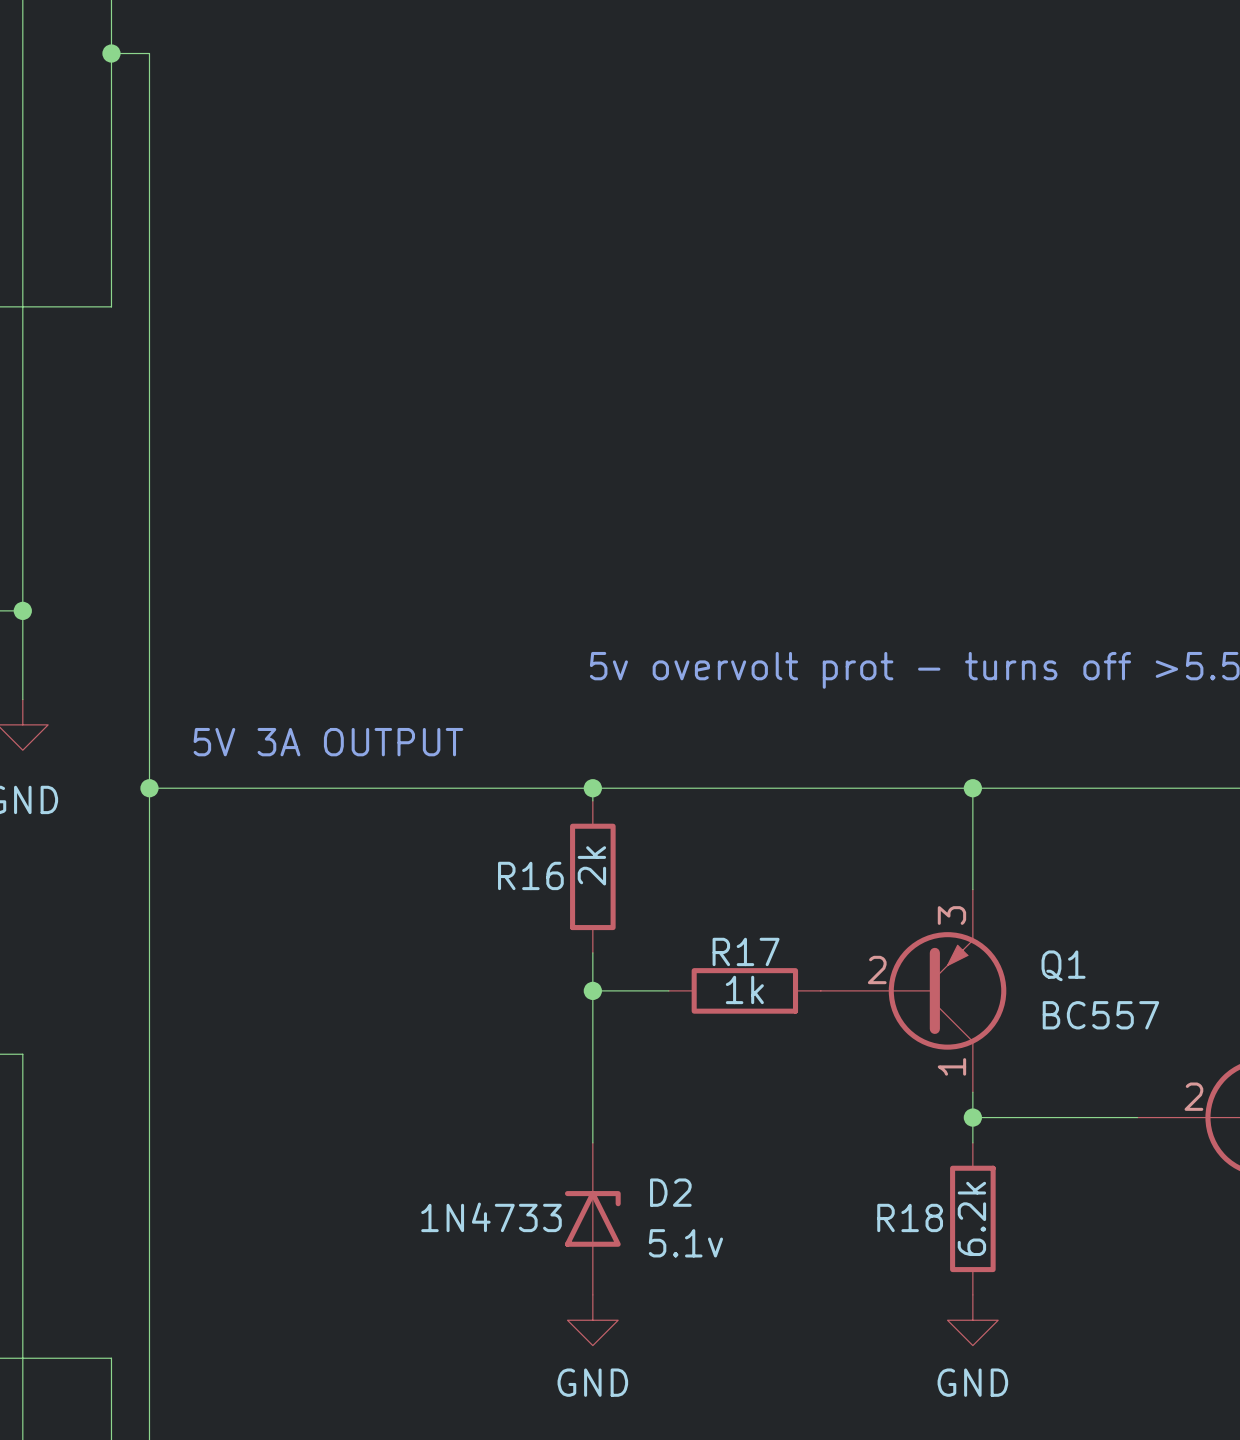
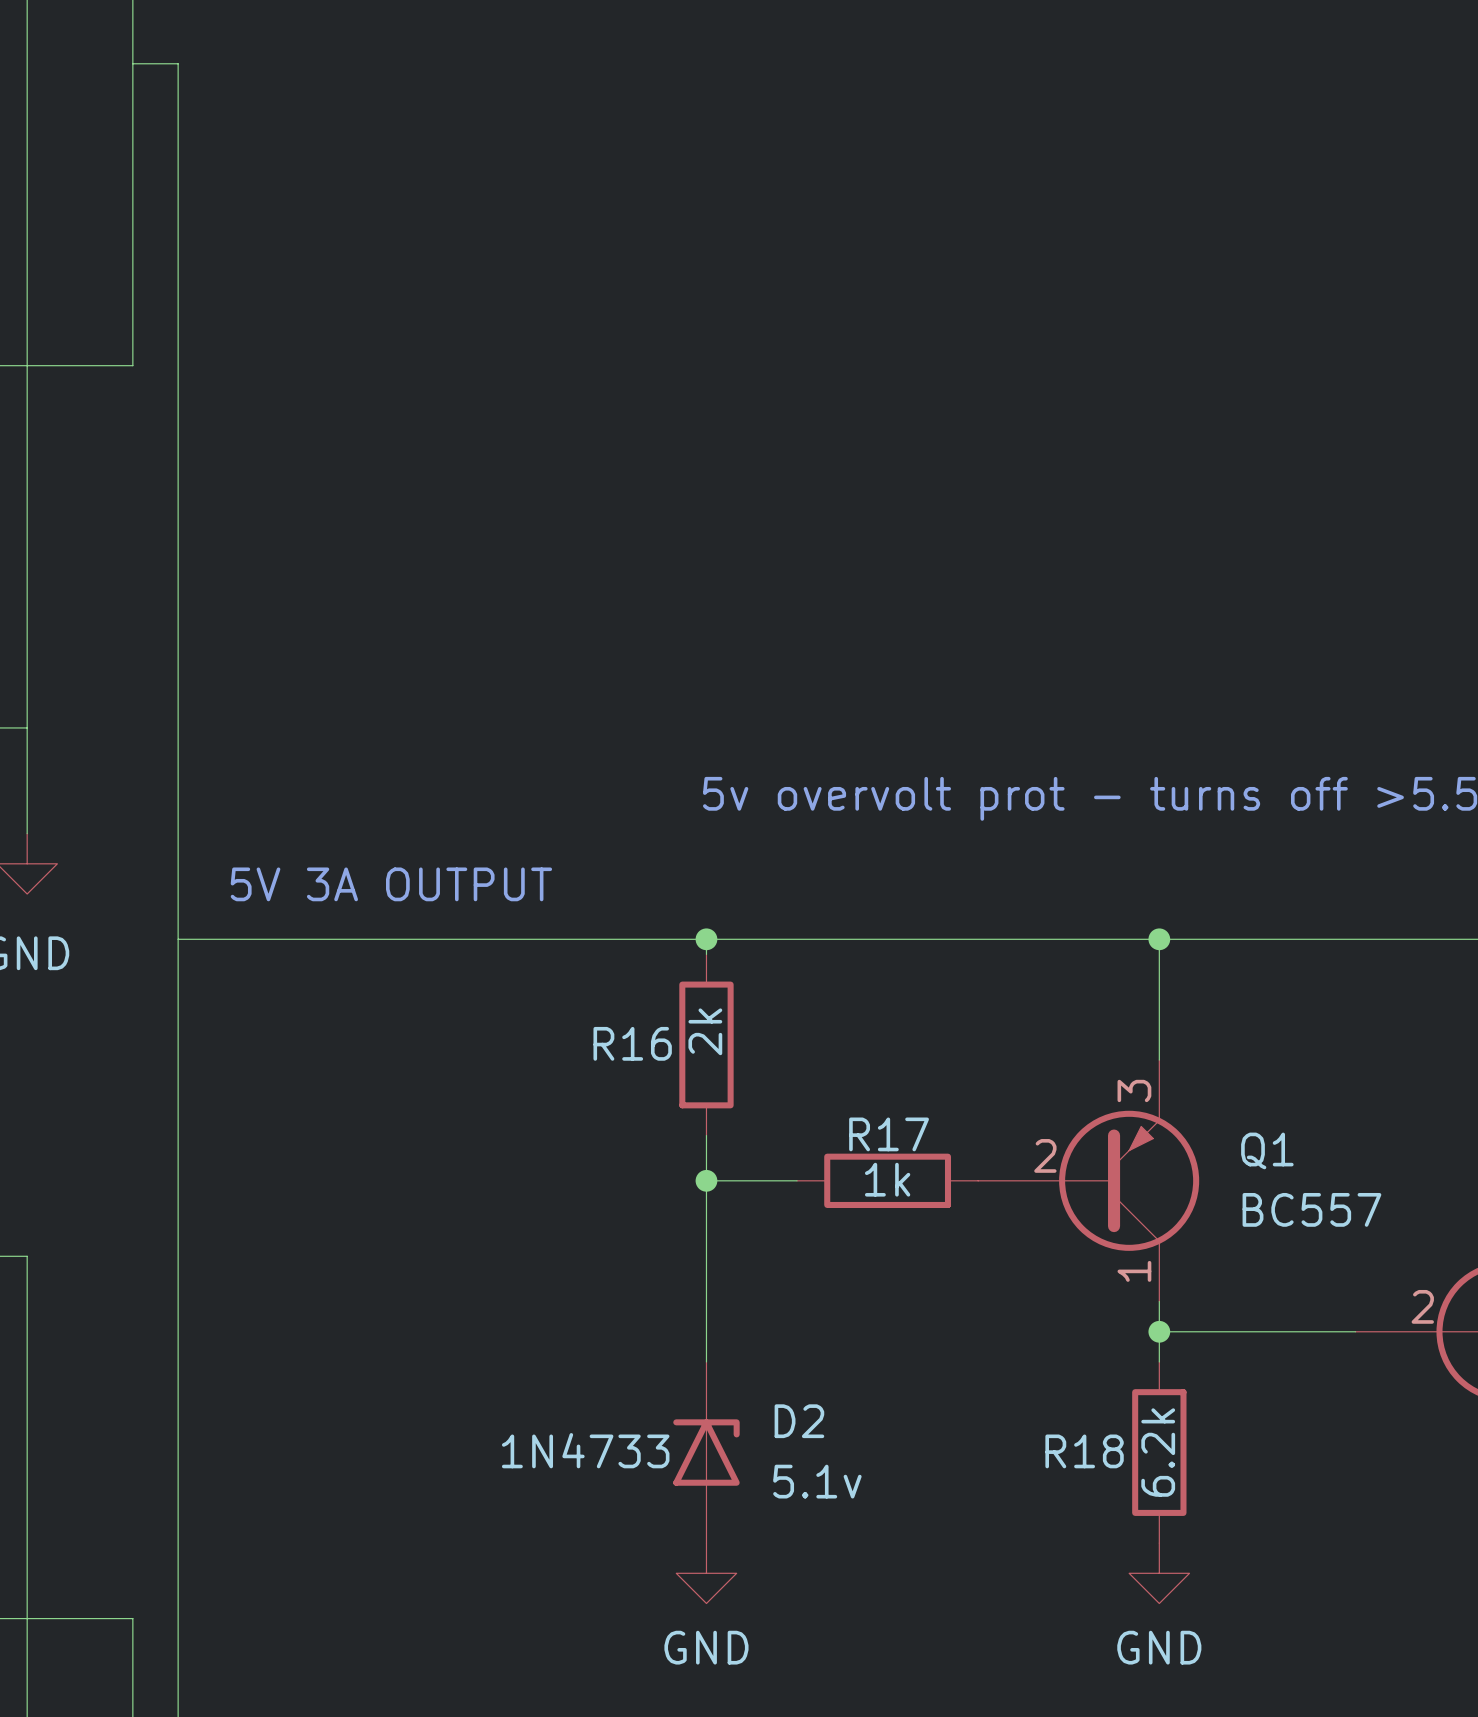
junction: (111, 53) -> none
junction: (22, 610) -> none
junction: (149, 788) -> none

